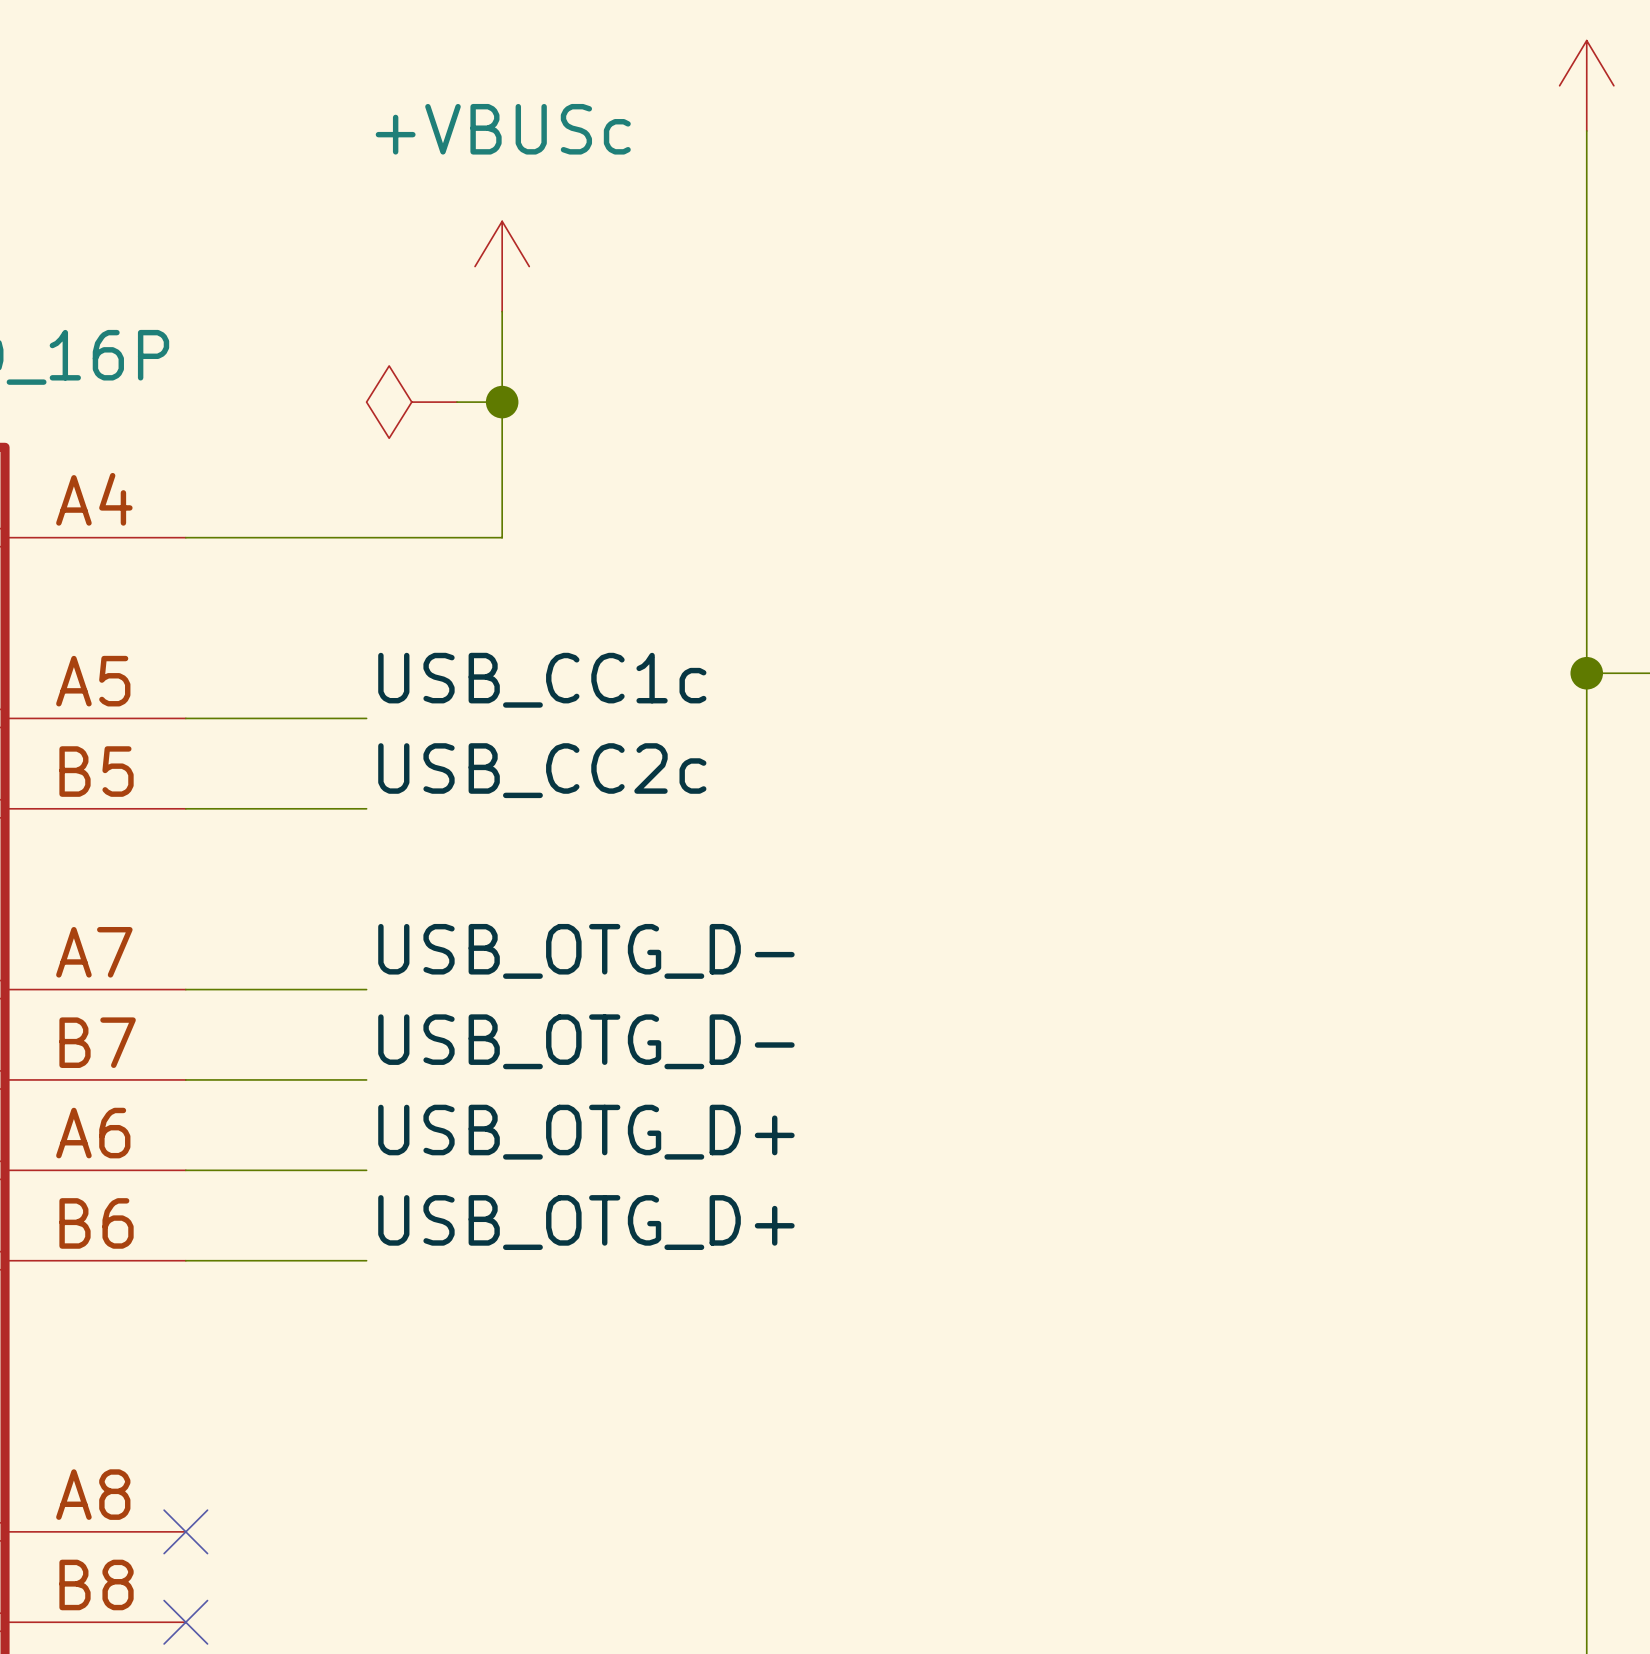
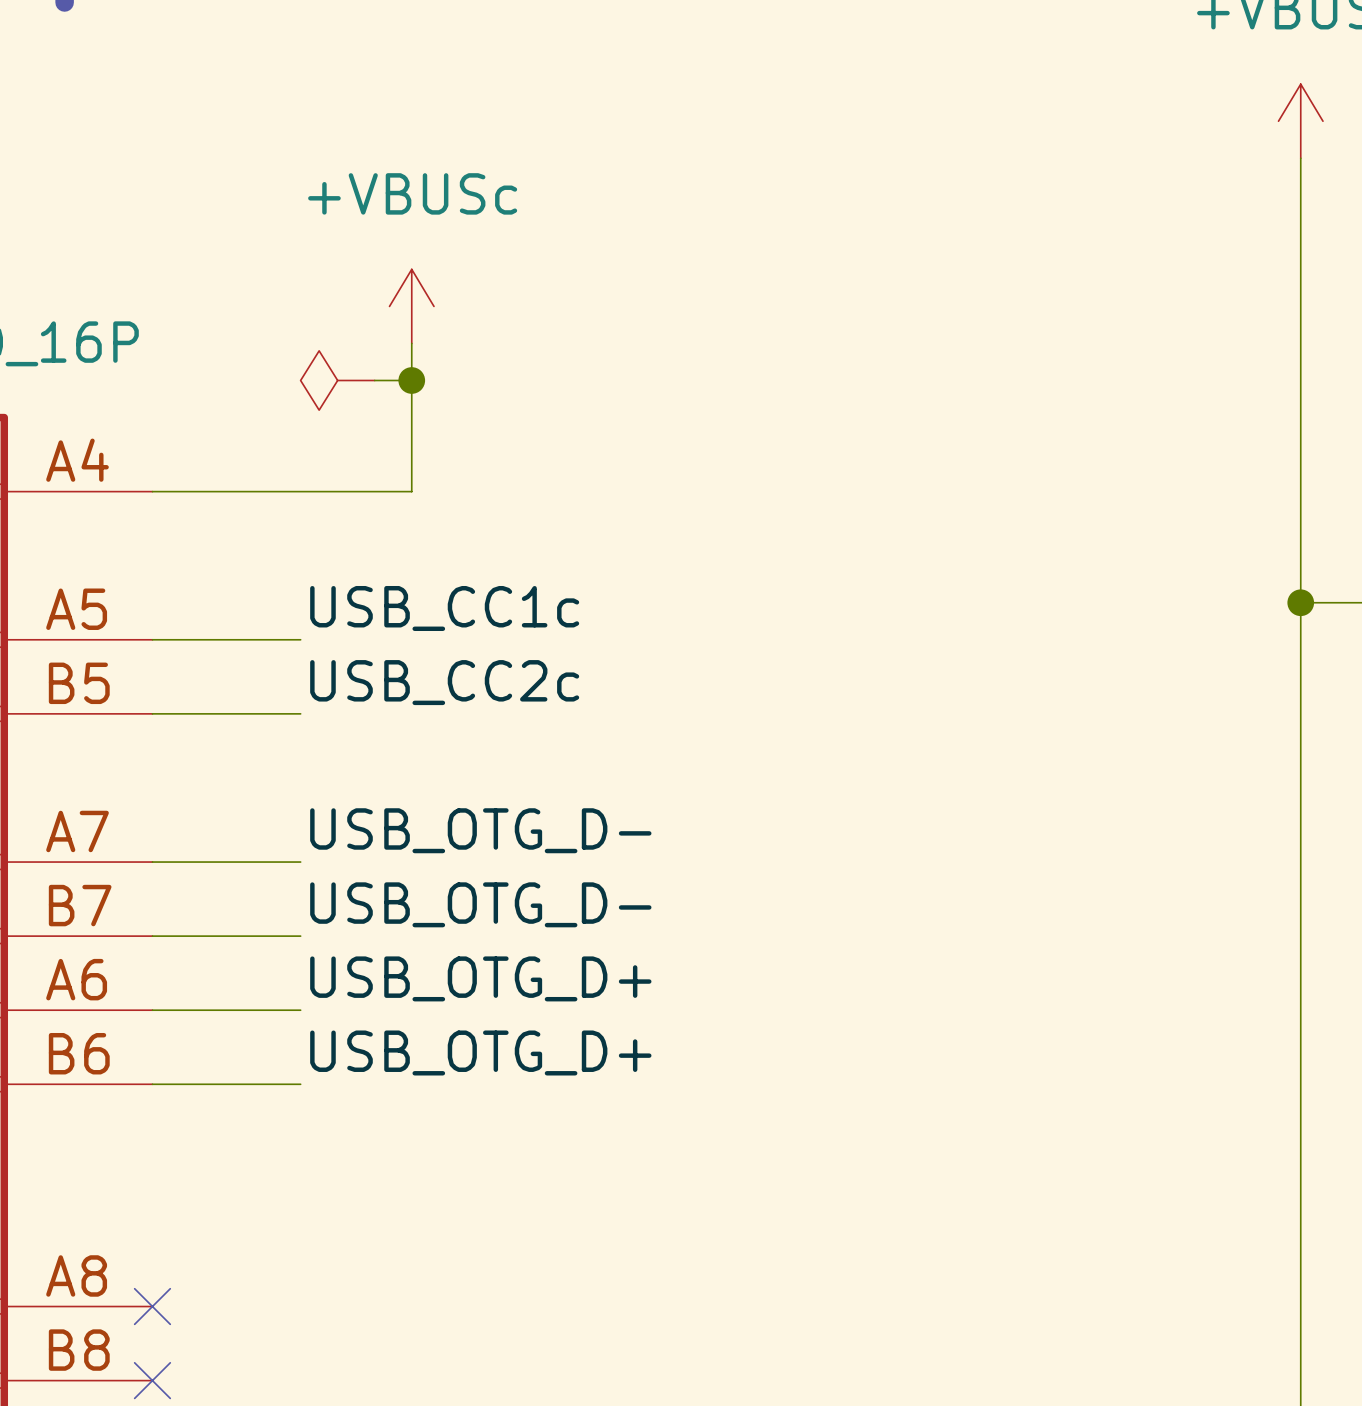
power symbol position: +VBUSc (502, 266) -> +VBUSc (411, 306)

